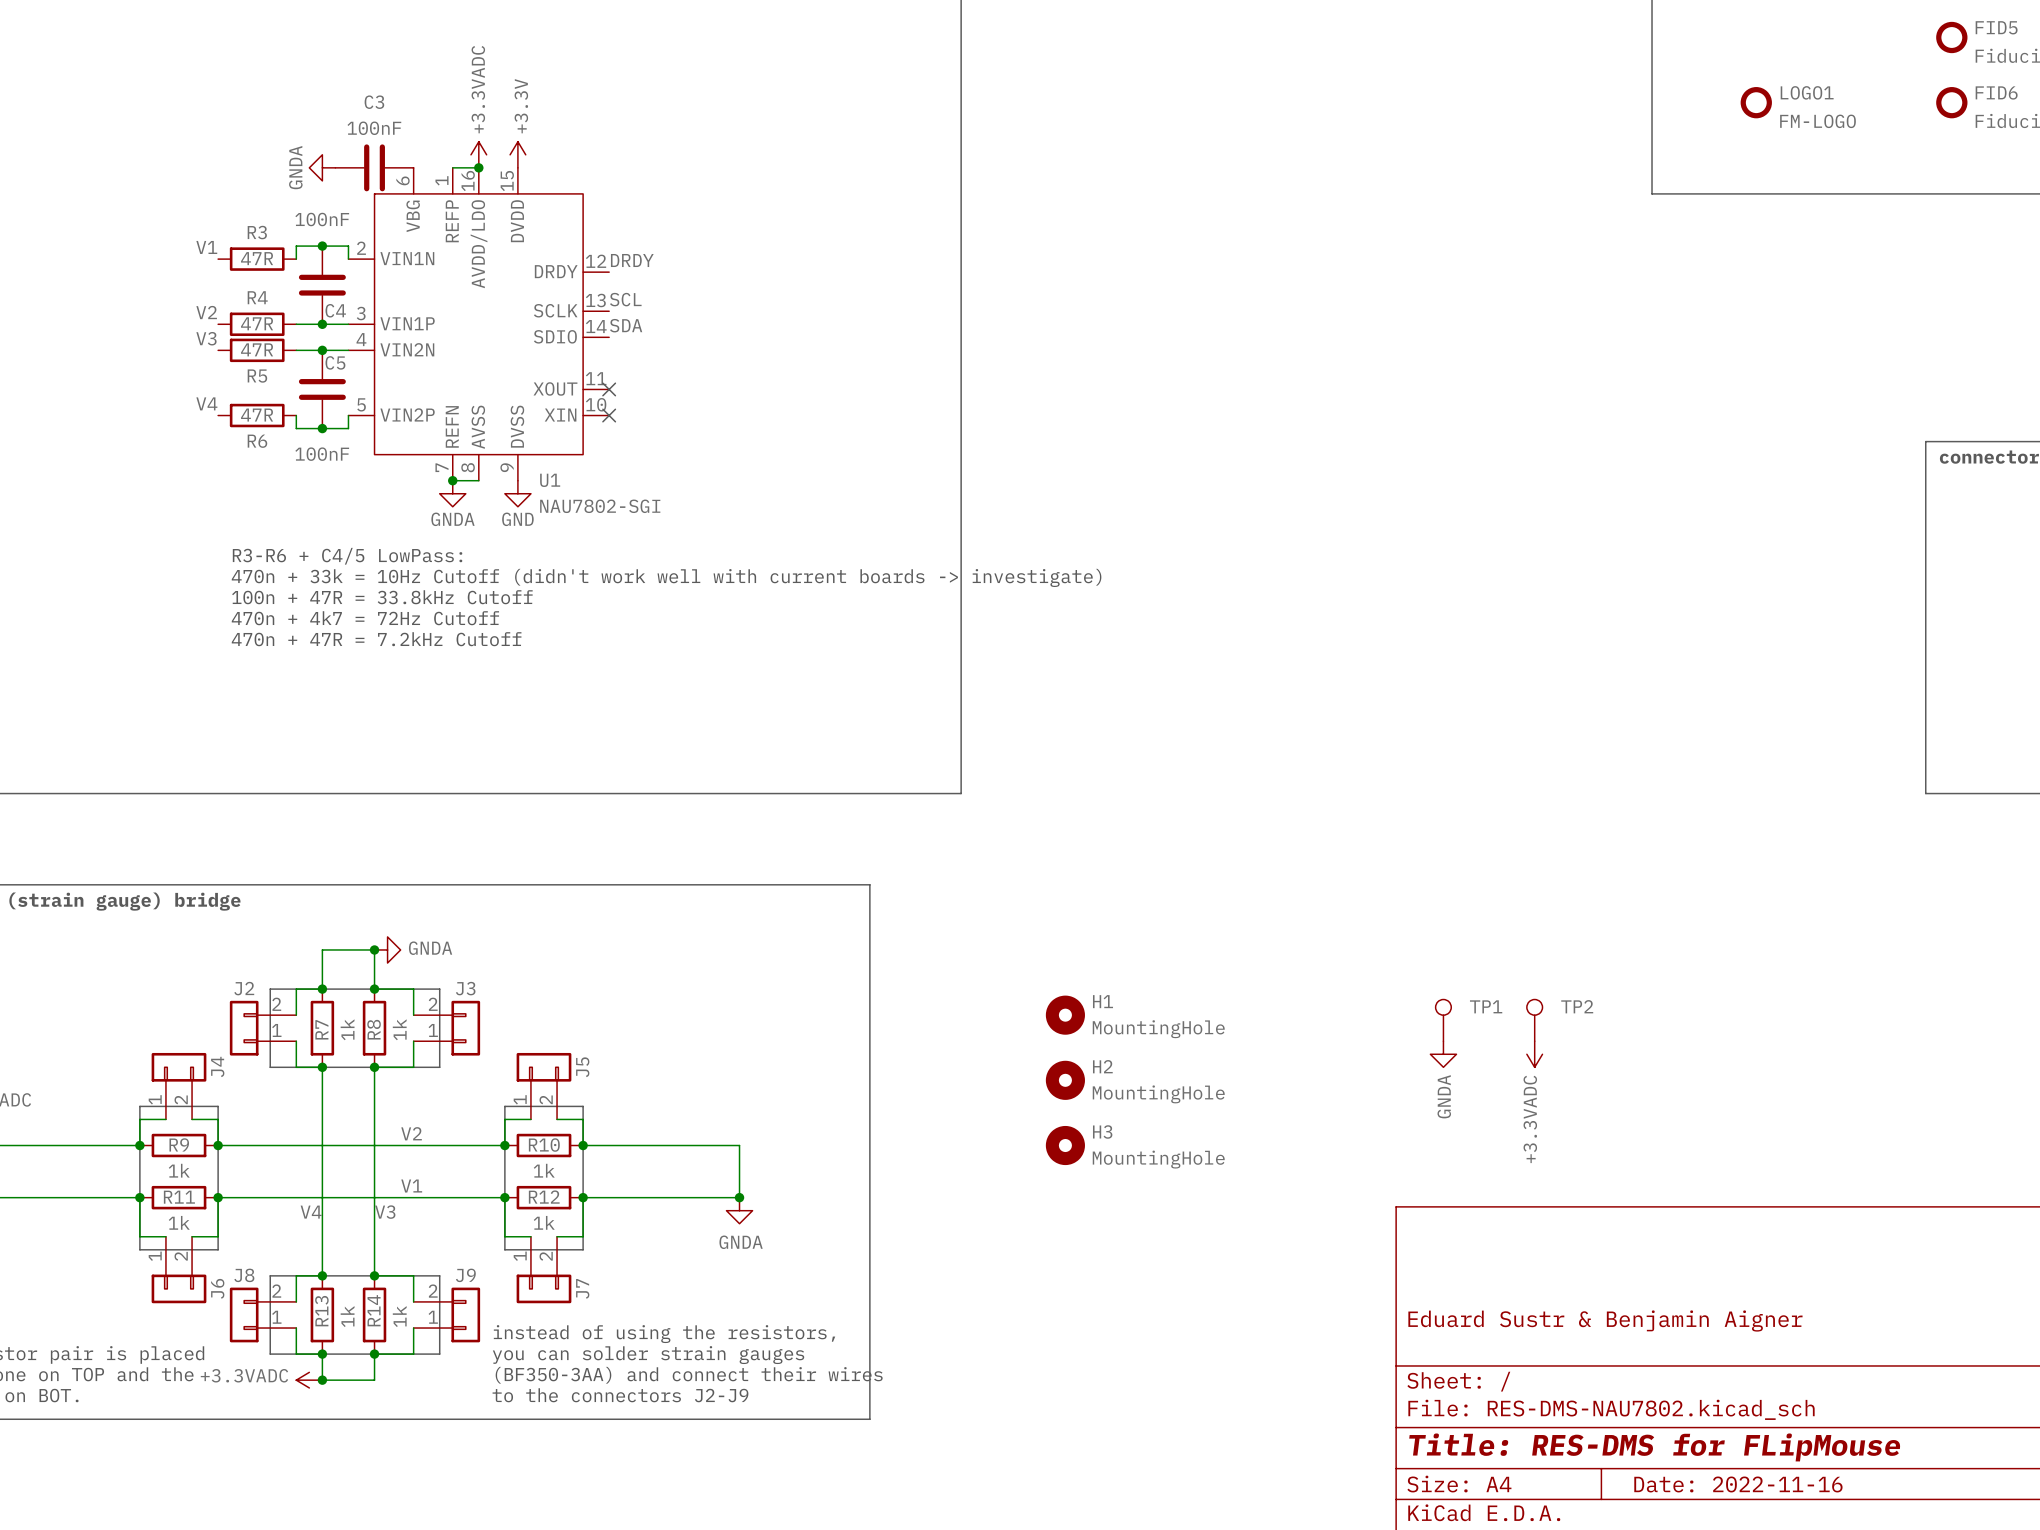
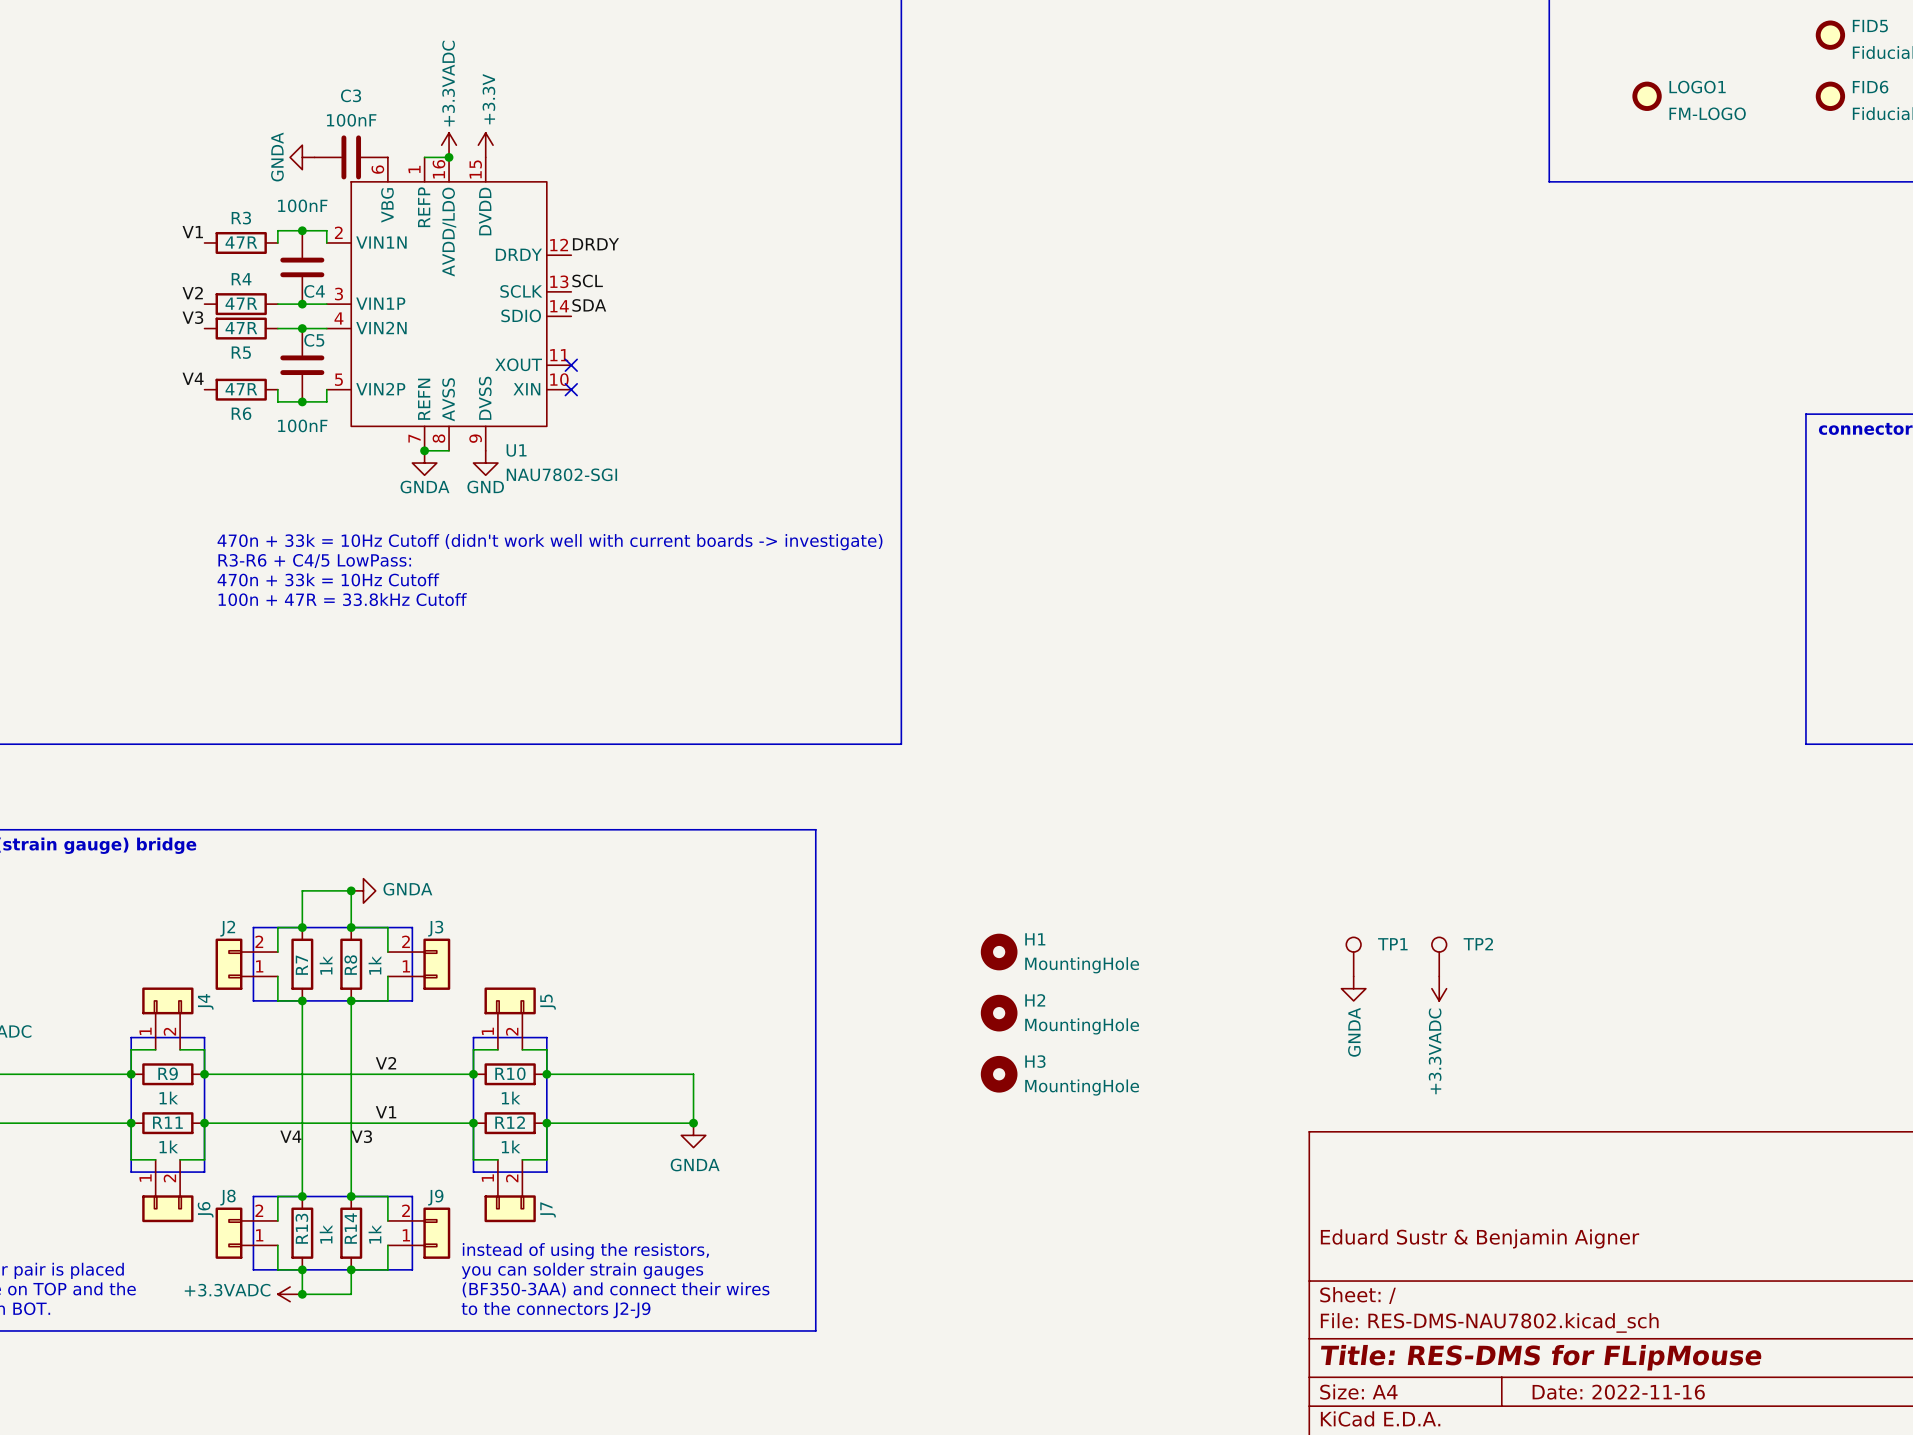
text: R3-R6 + C4/5 LowPass: (347, 556) -> none
text: 100n + 47R = 33.8kHz Cutoff (382, 597) -> R3-R6 + C4/5 LowPass: (314, 561)
text: 470n + 4k7 = 72Hz Cutoff (365, 618) -> 470n + 33k = 10Hz Cutoff (328, 579)
text: 470n + 47R = 7.2kHz Cutoff (376, 639) -> 100n + 47R = 33.8kHz Cutoff (342, 599)

